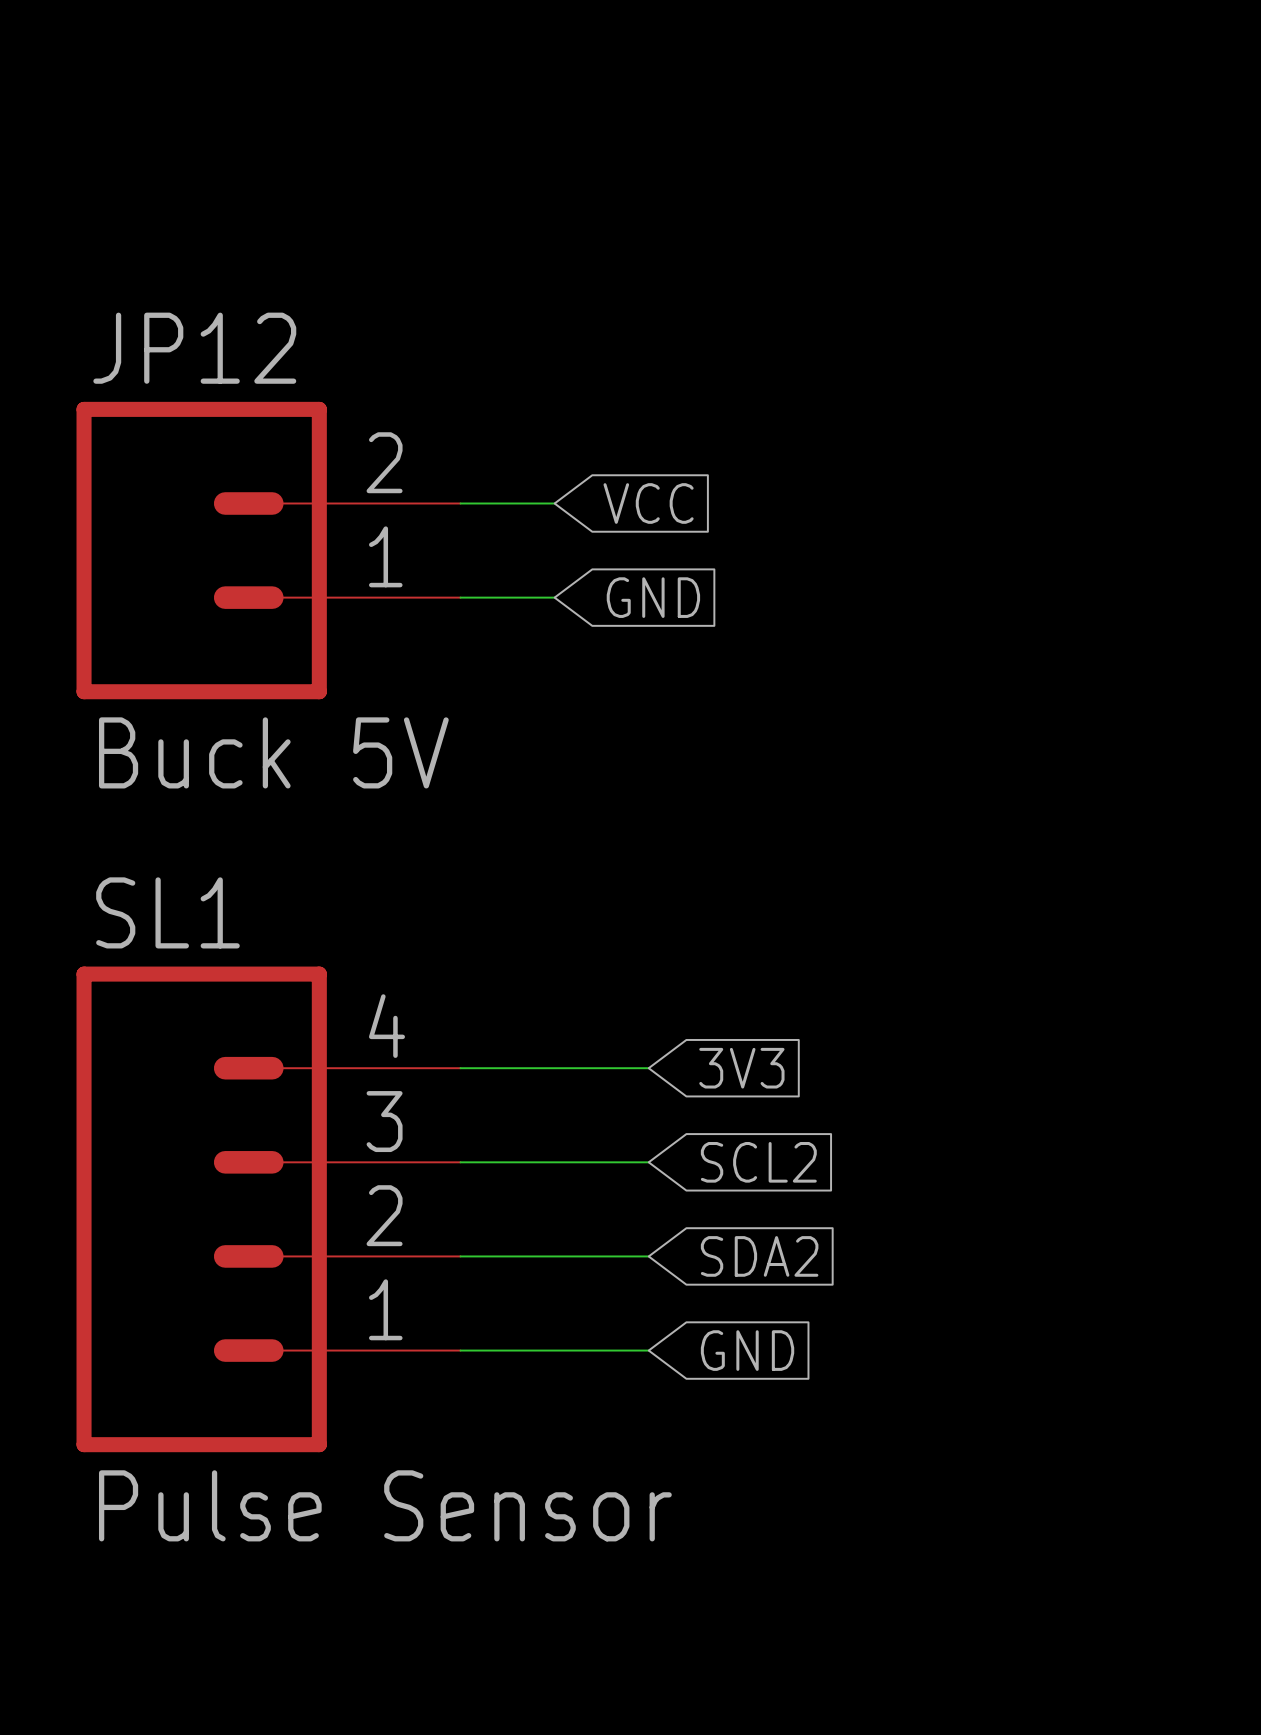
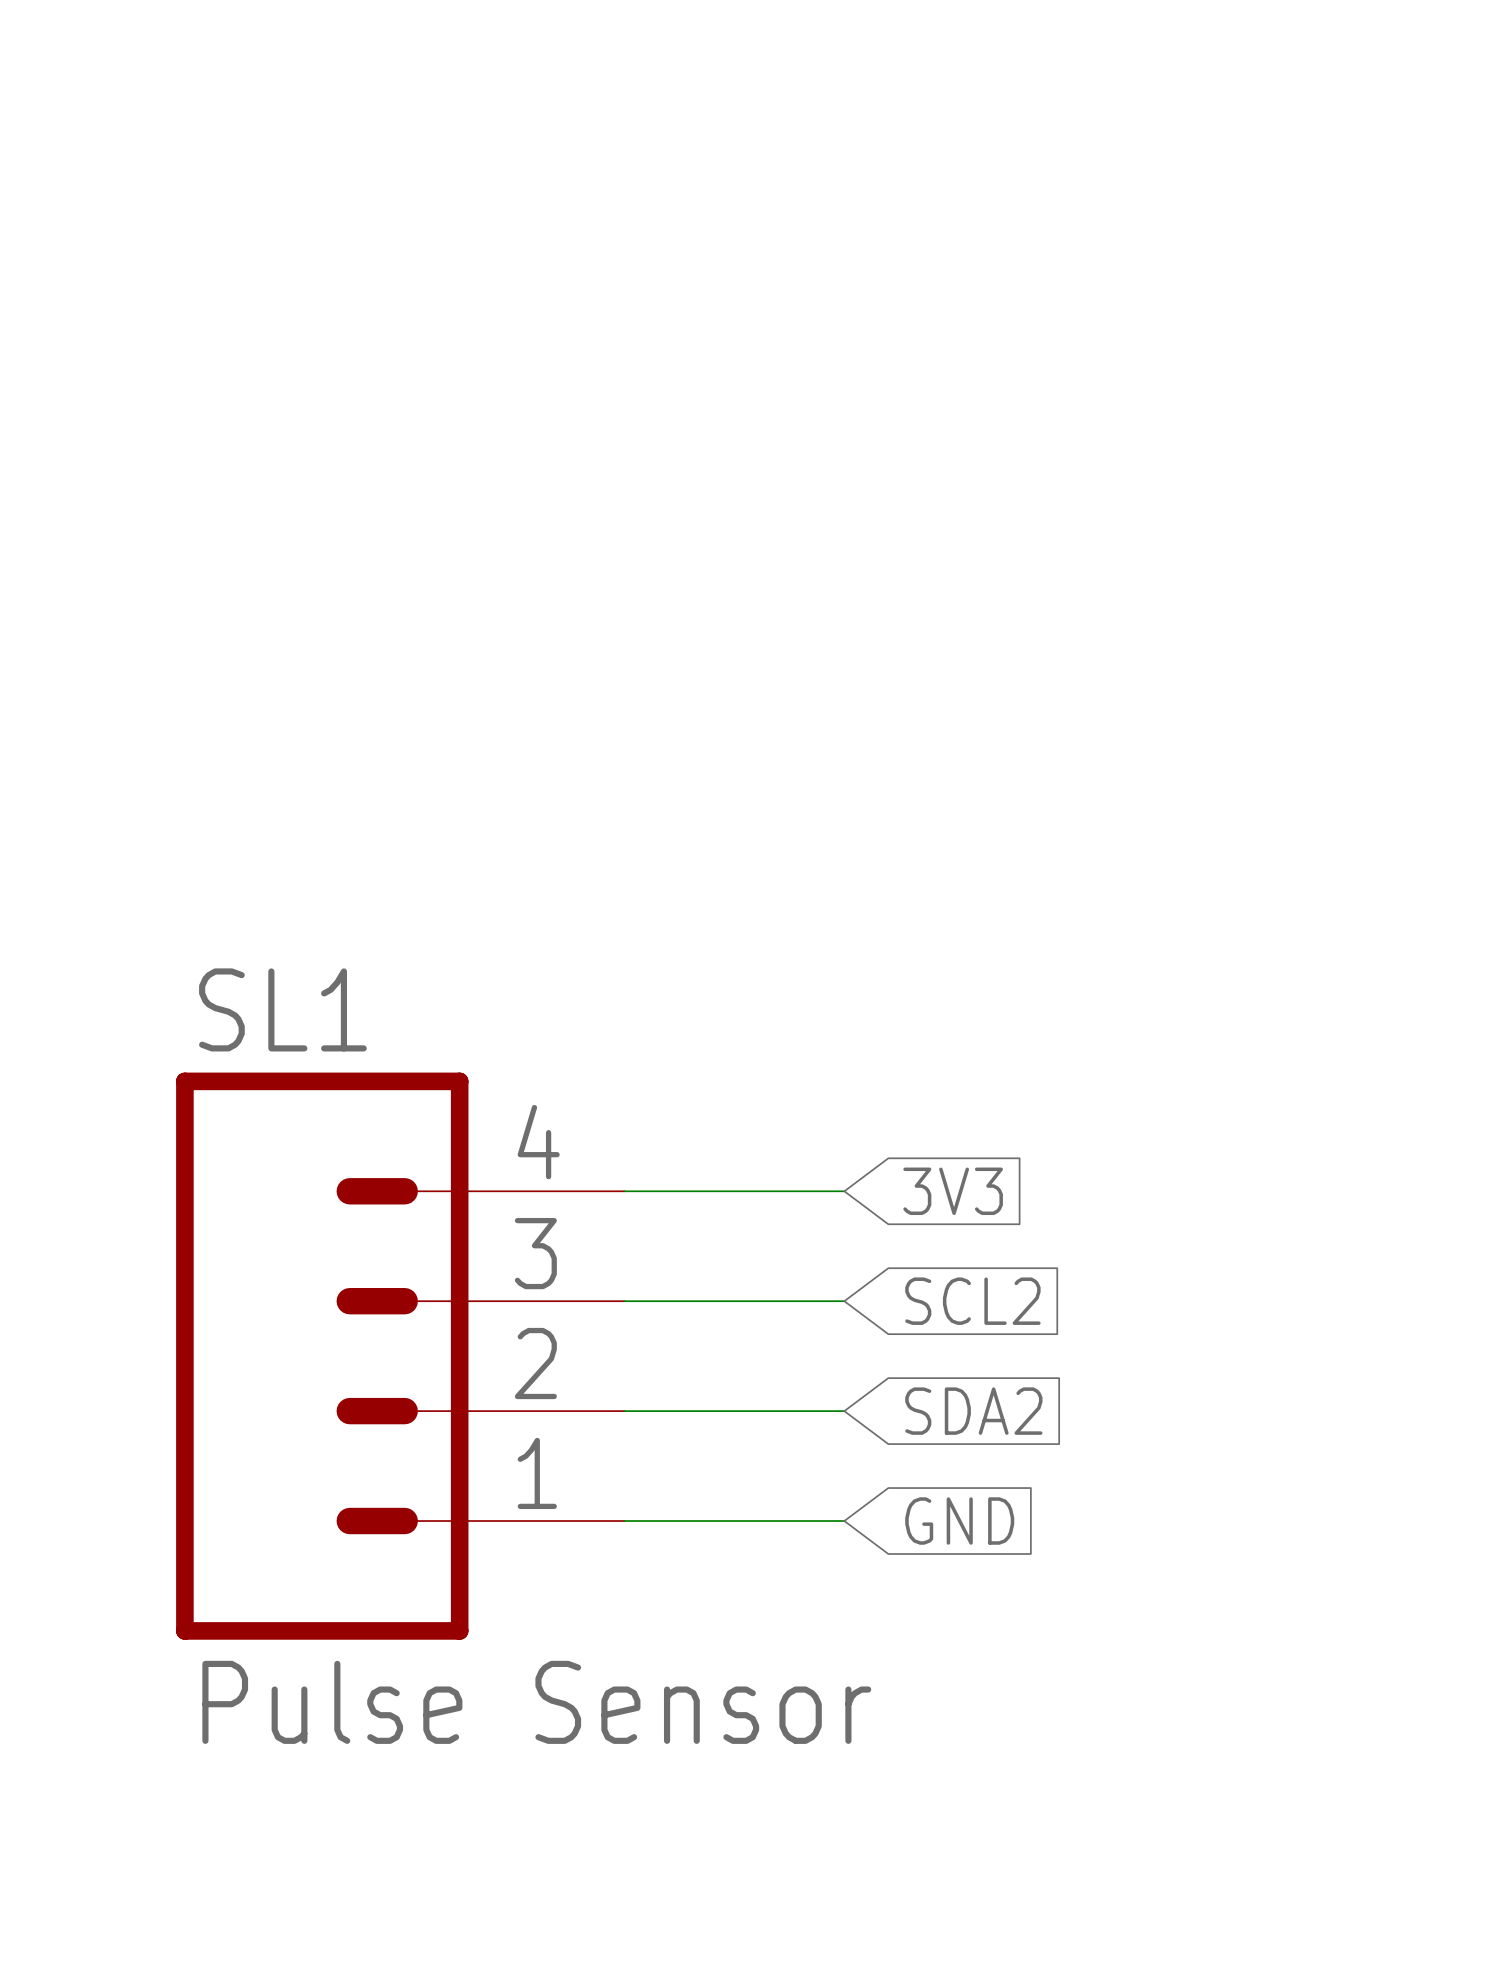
wire: (460, 503) (554, 503) -> none
global label: VCC (648, 503) -> none
JP12: Buck 5V (268, 550) -> none
wire: (460, 597) (554, 597) -> none
global label: GND (653, 597) -> none

